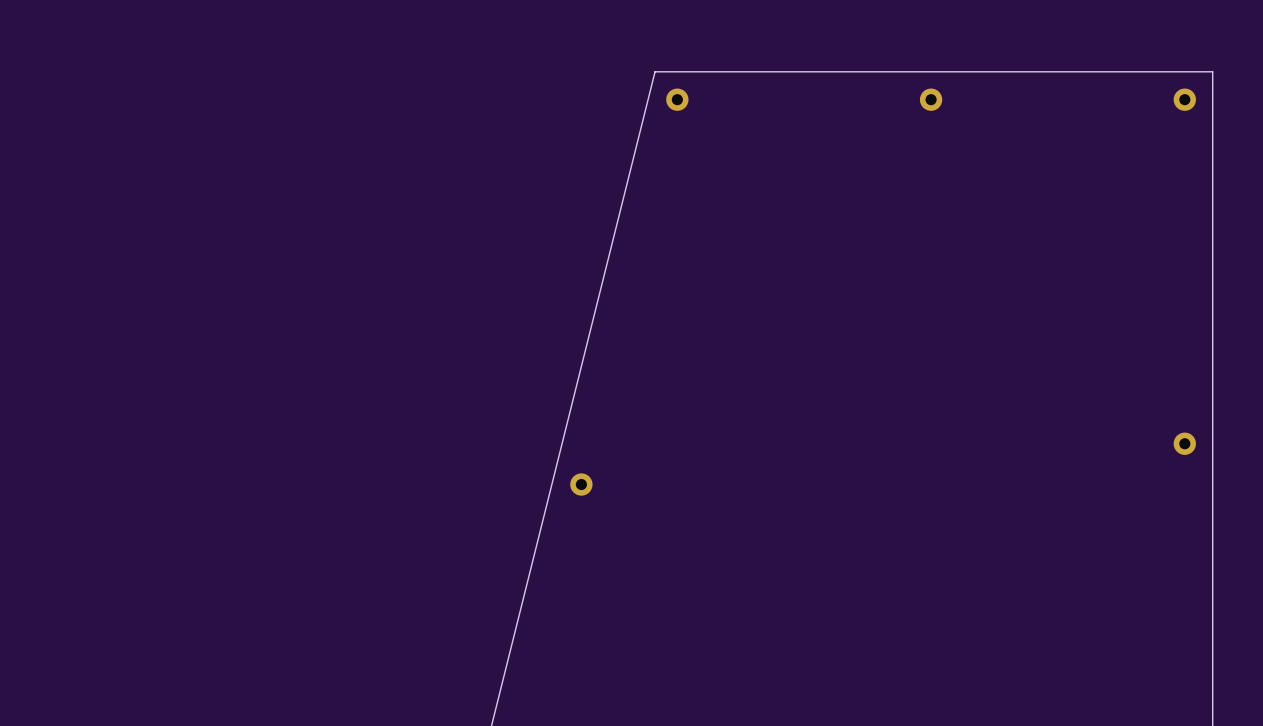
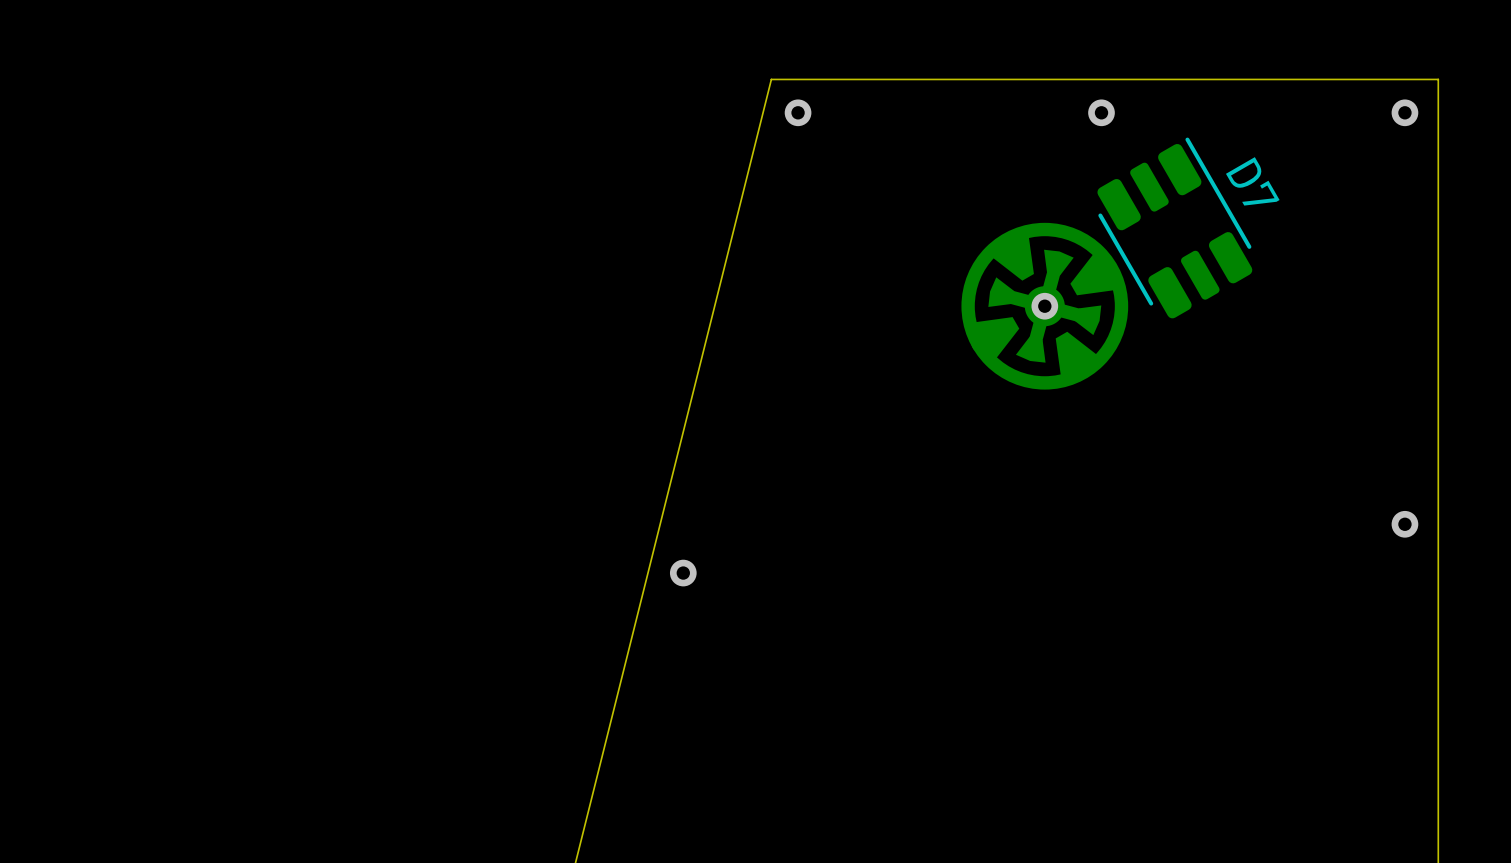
D7: none -> (1174, 227)
part: none -> (1044, 306)
via: none -> (1044, 306)

